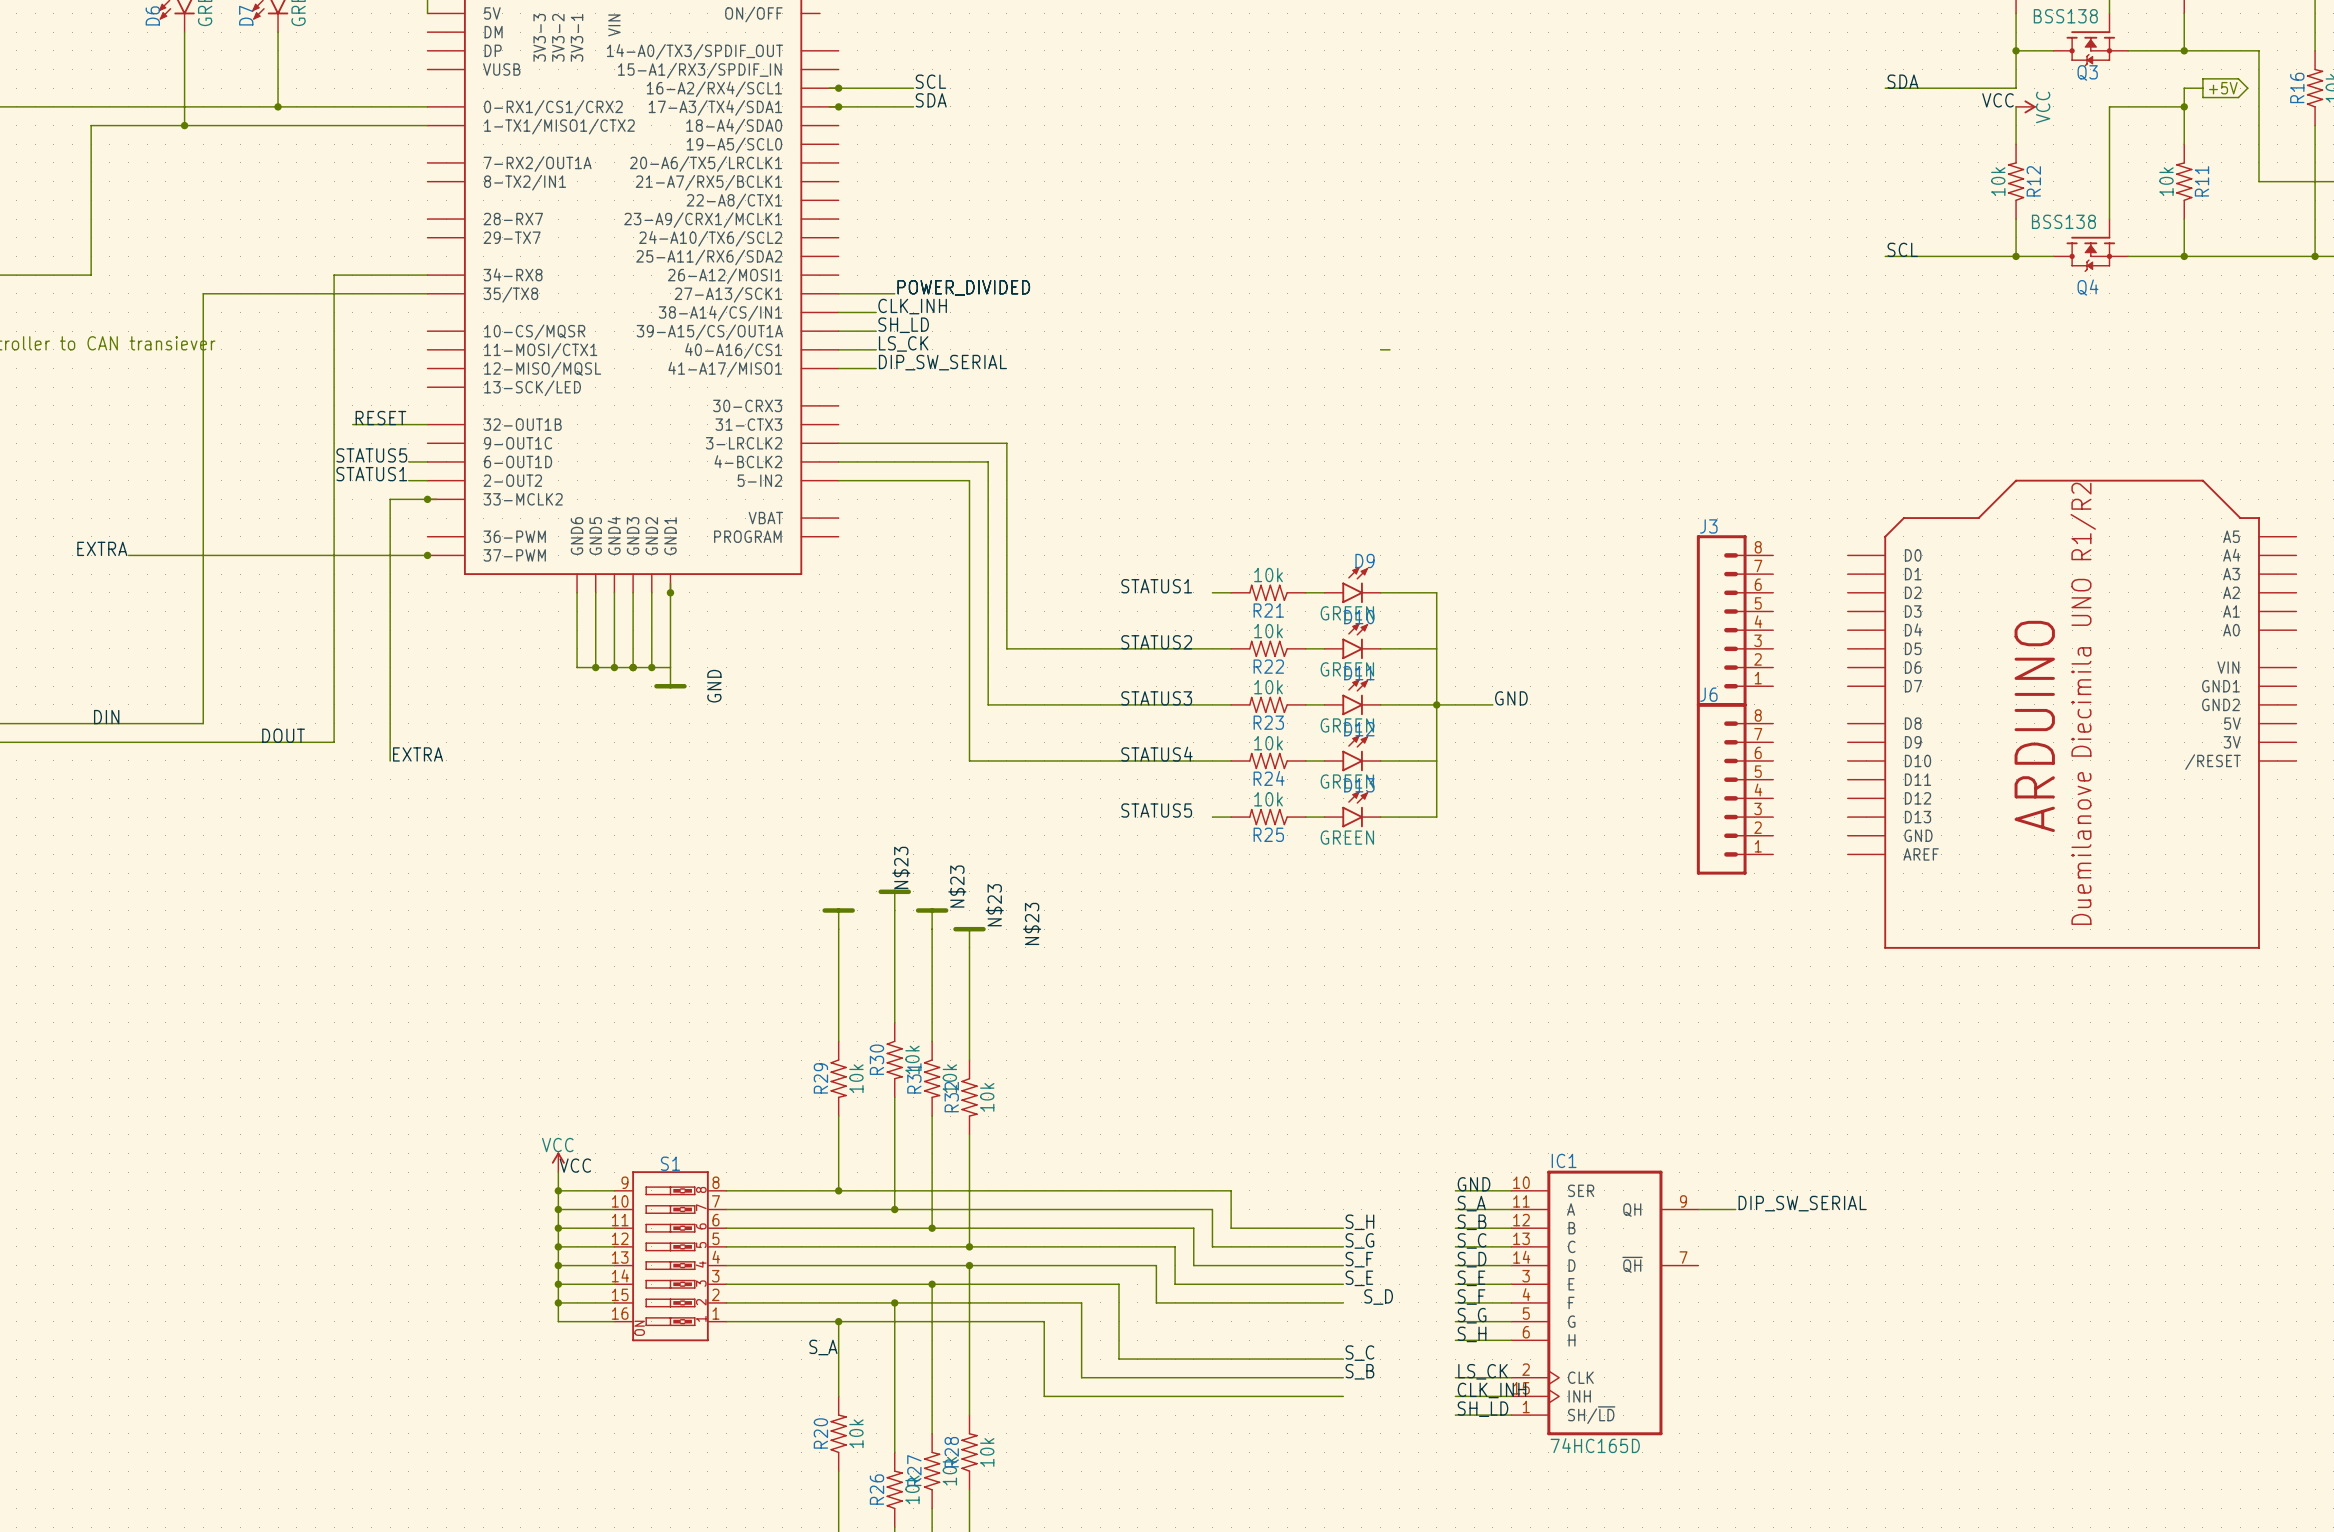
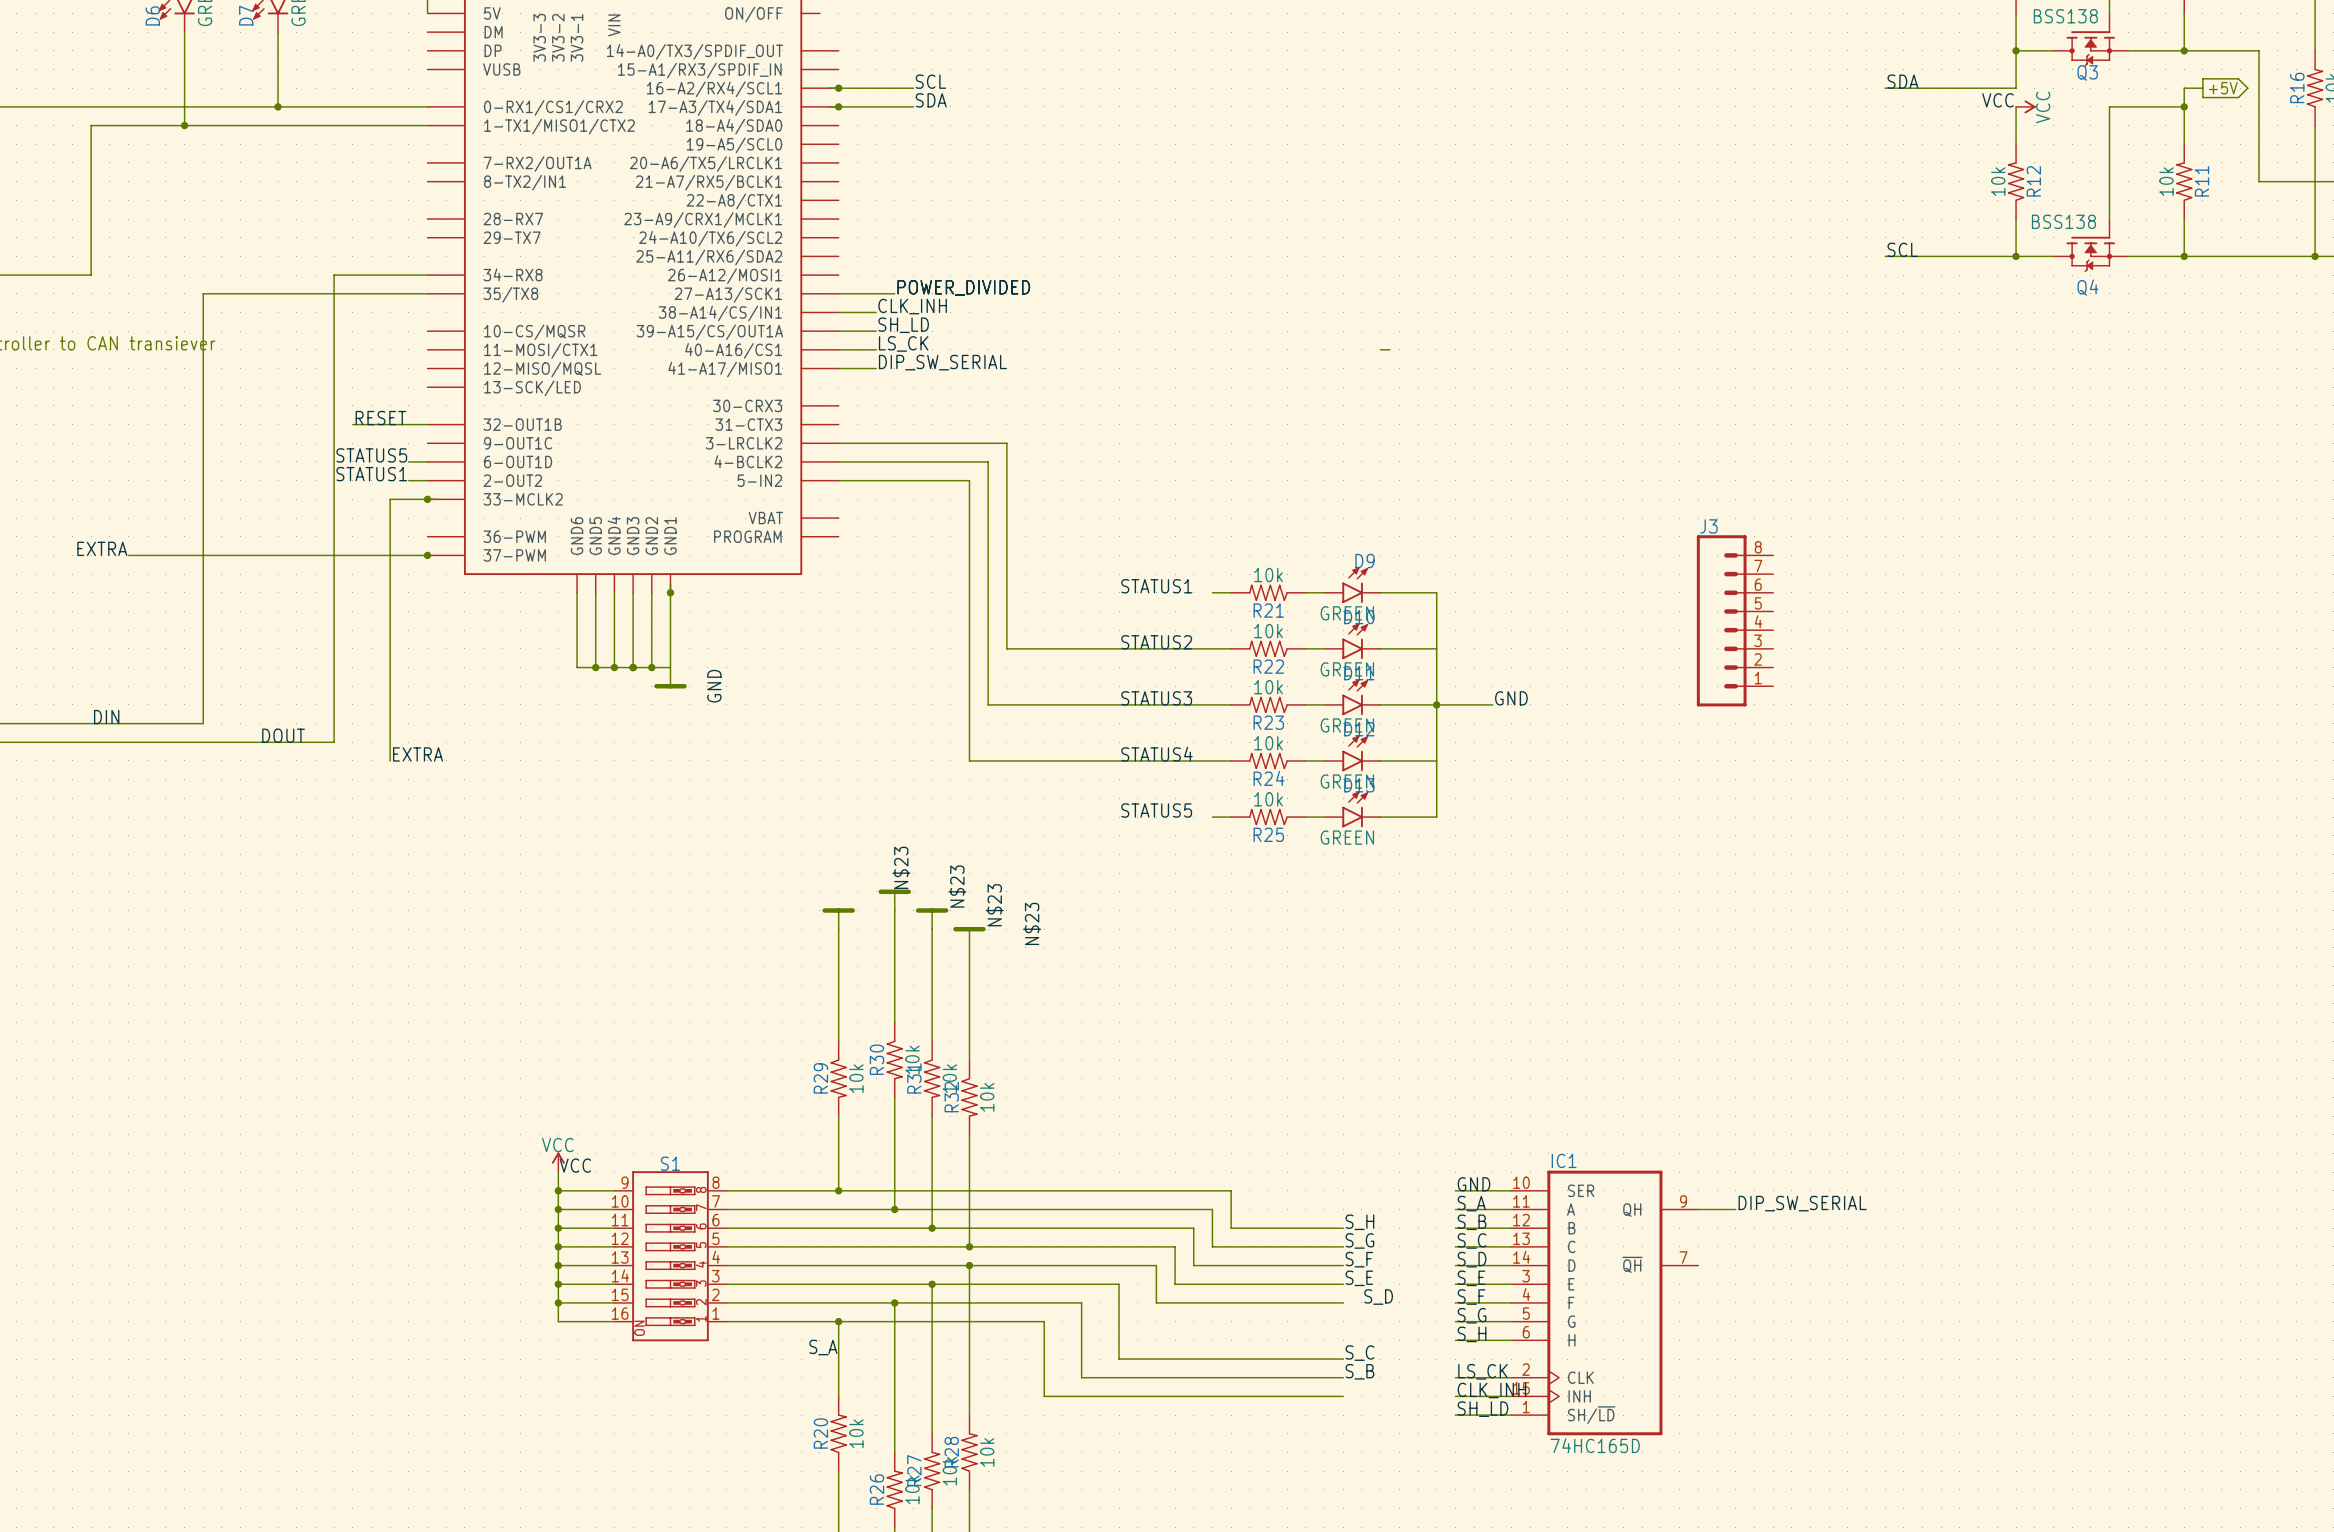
part: (2072, 714) -> none
J6: (1734, 789) -> none

